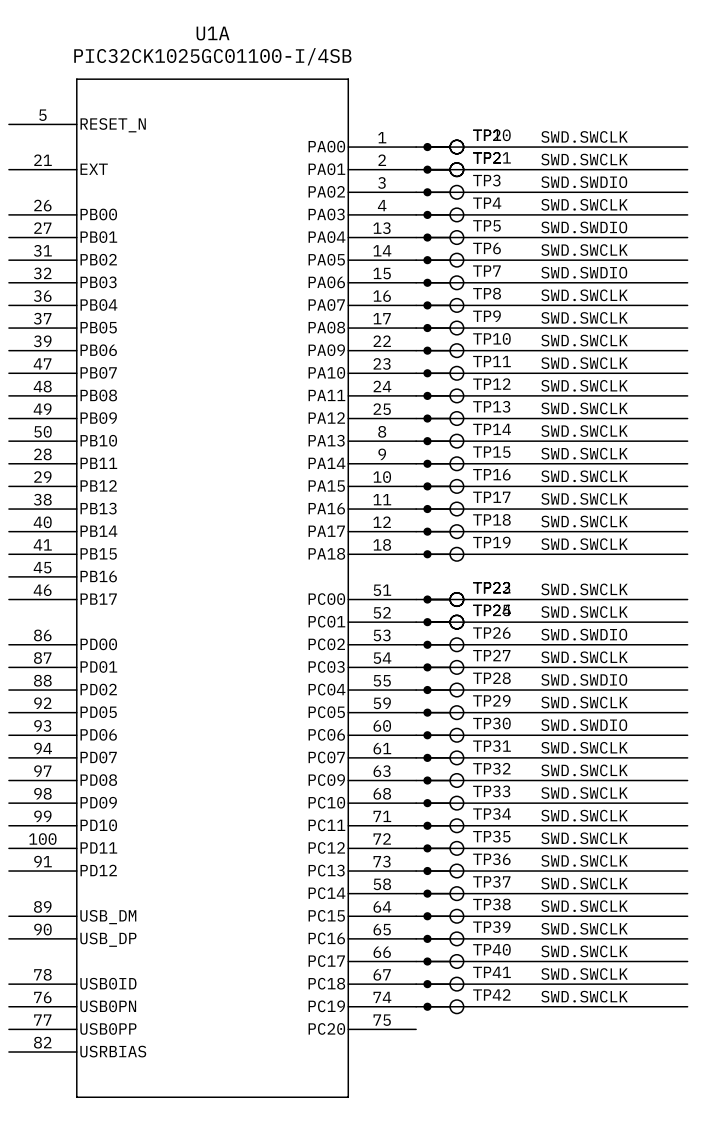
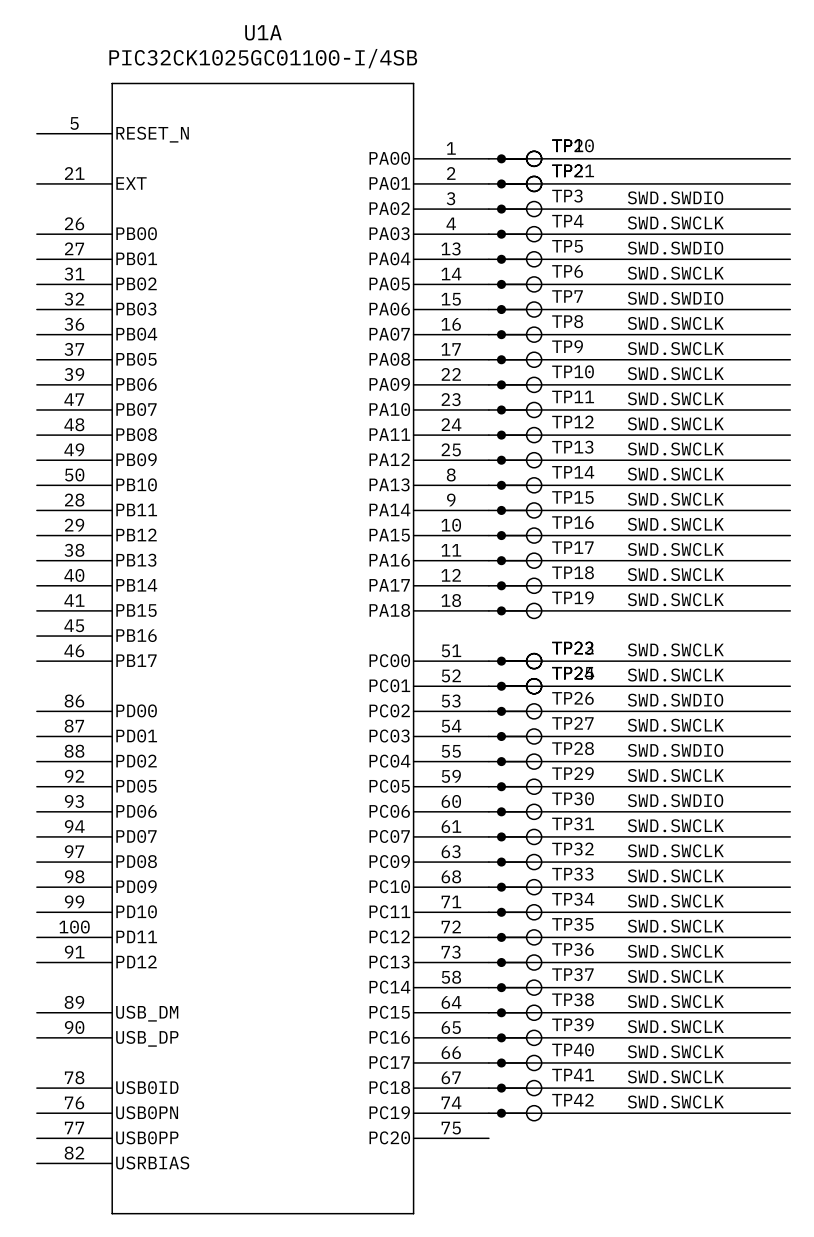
label: SWD.SWCLK (584, 136) -> none
label: SWD.SWCLK (584, 159) -> none

